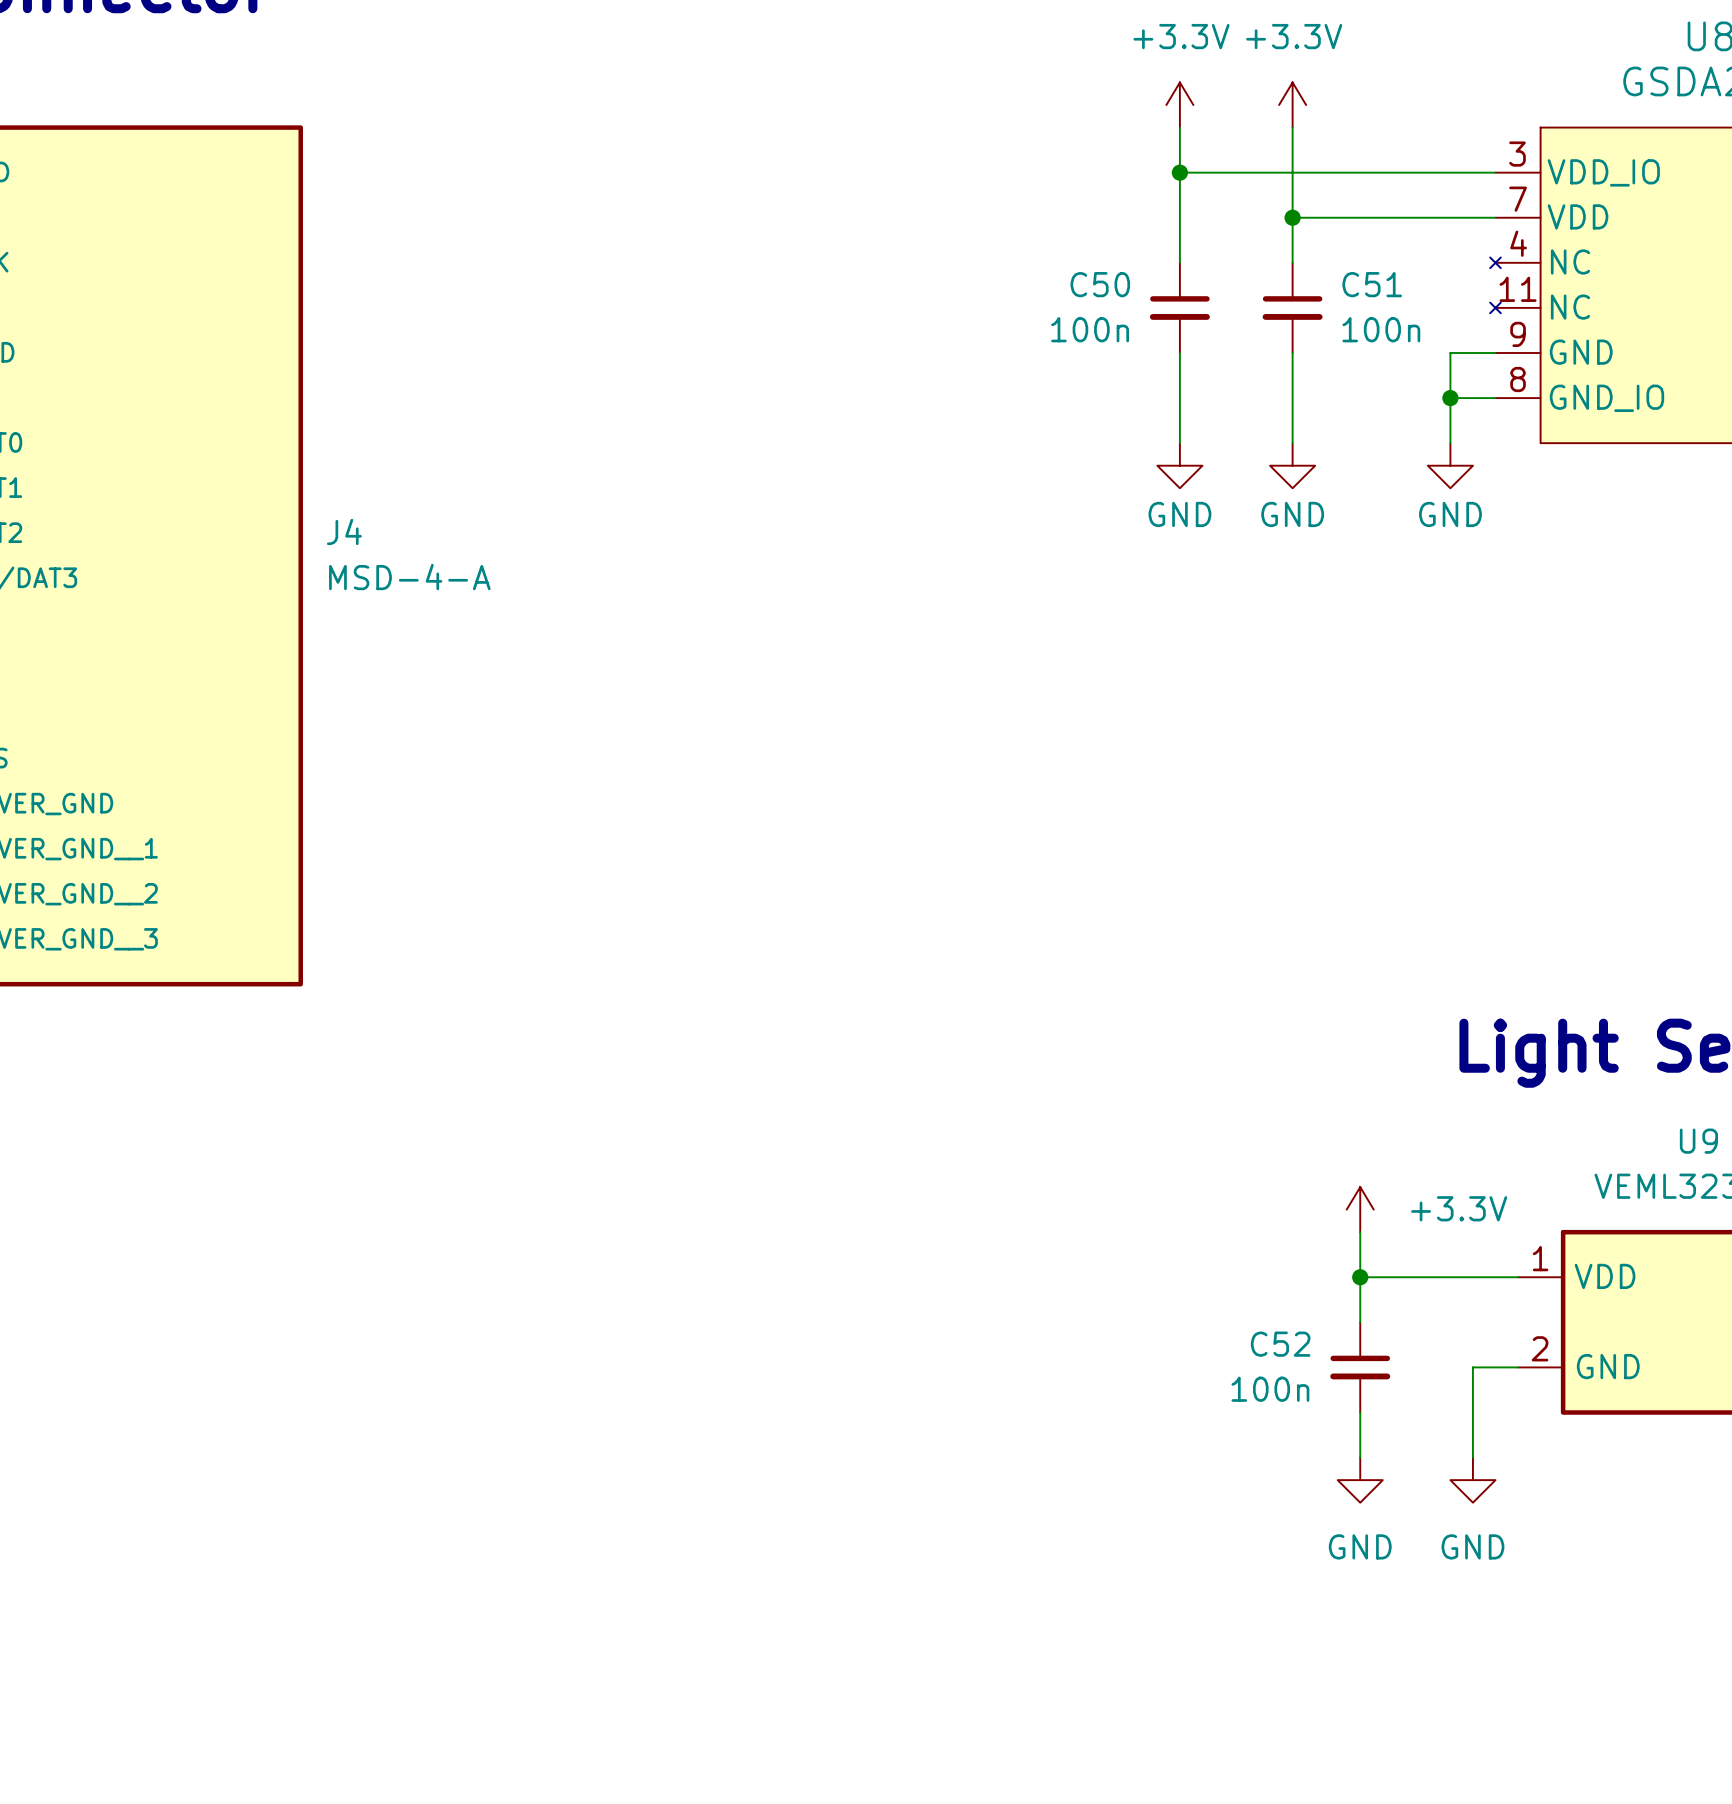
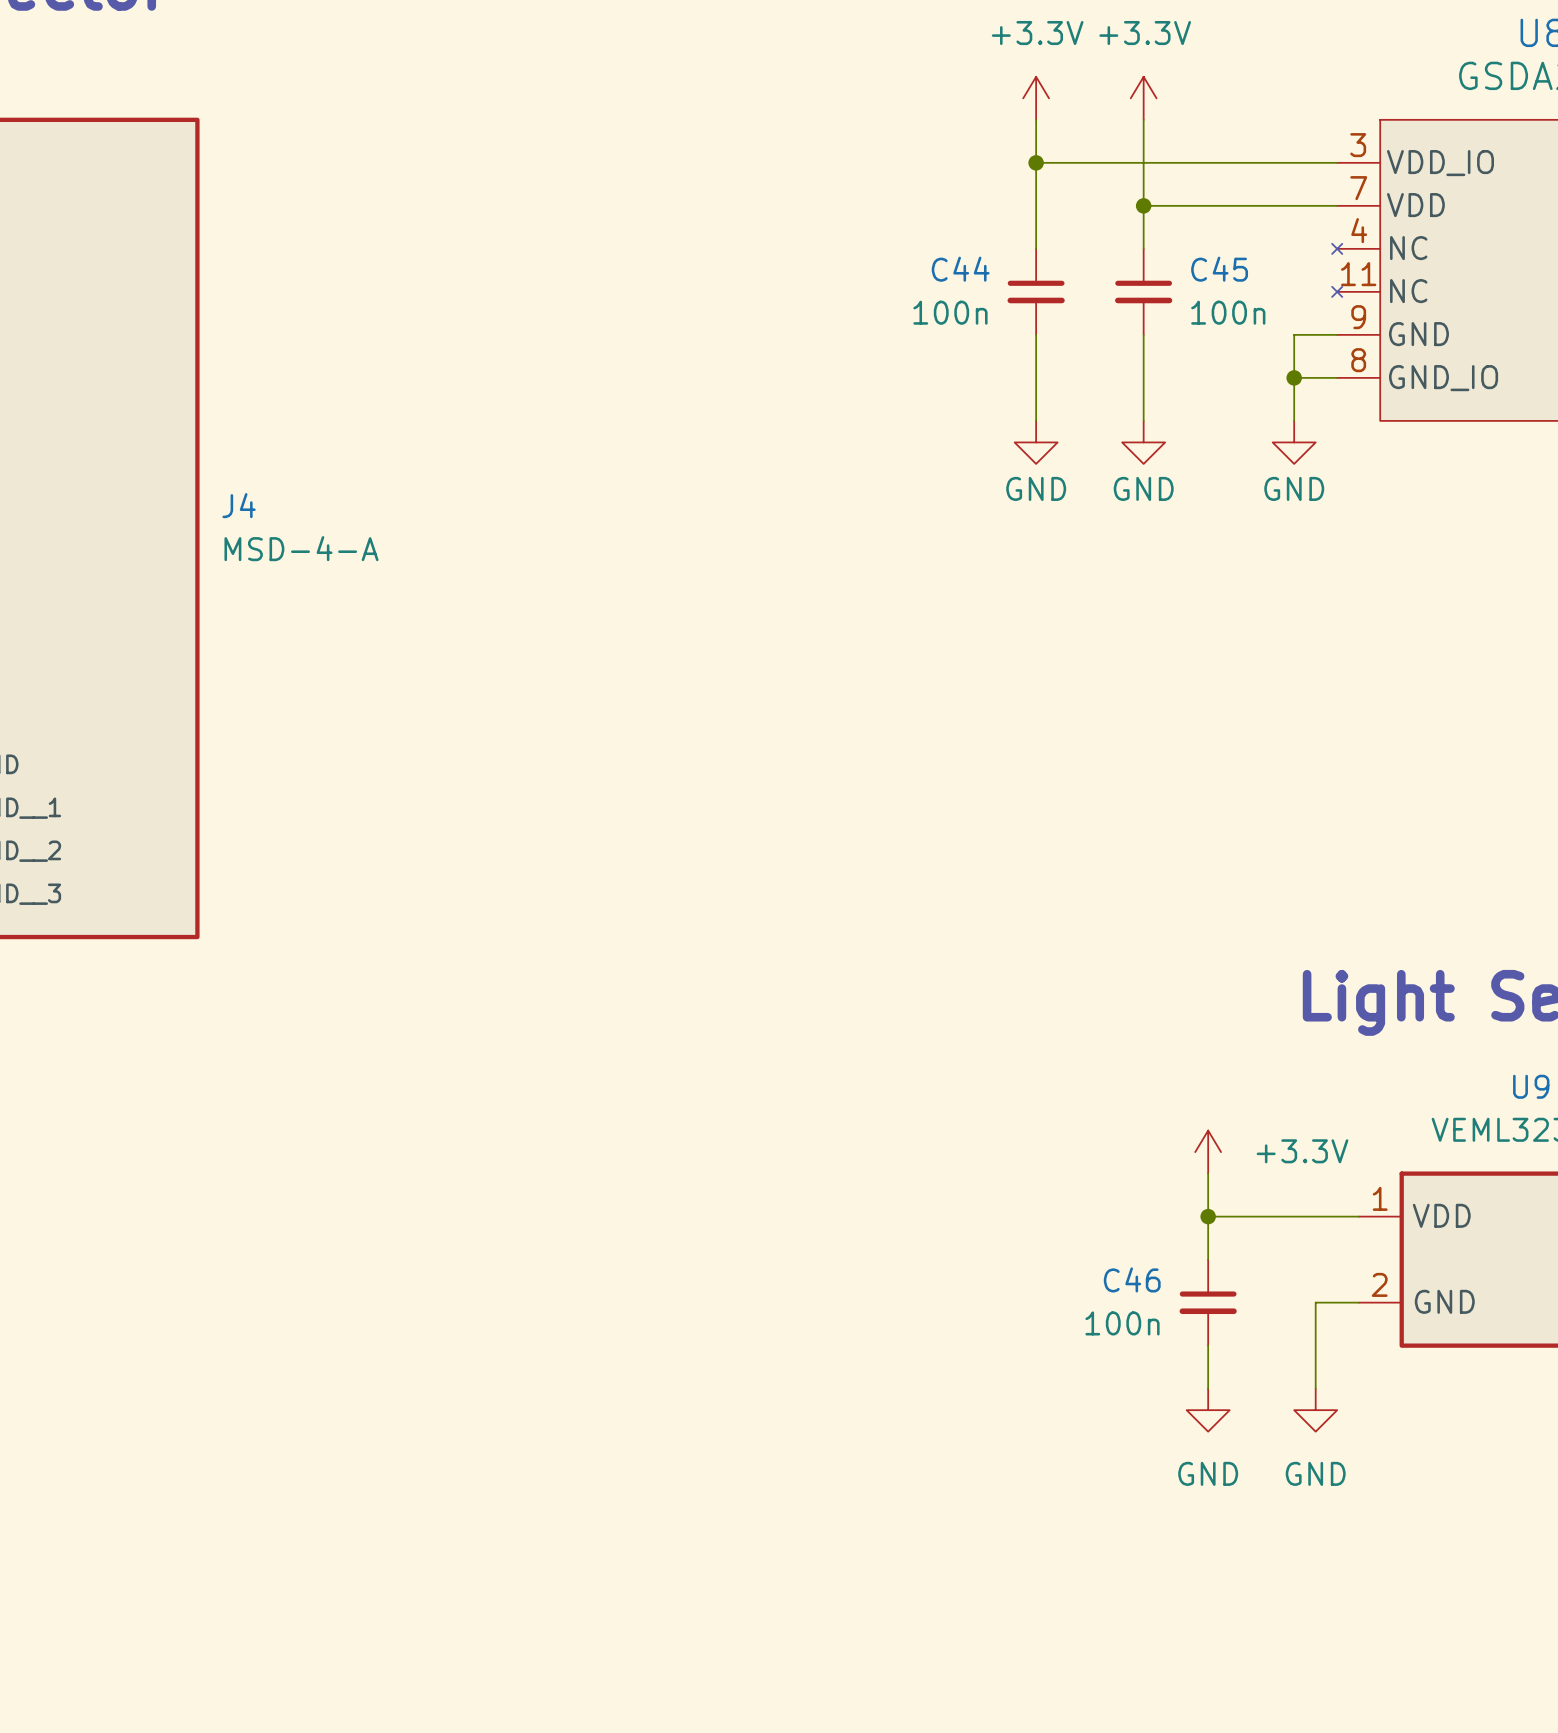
C50 name: C50 (1100, 284) -> C44 (960, 269)
C51 name: C51 (1372, 284) -> C45 (1219, 269)
C52 name: C52 (1280, 1344) -> C46 (1132, 1279)

